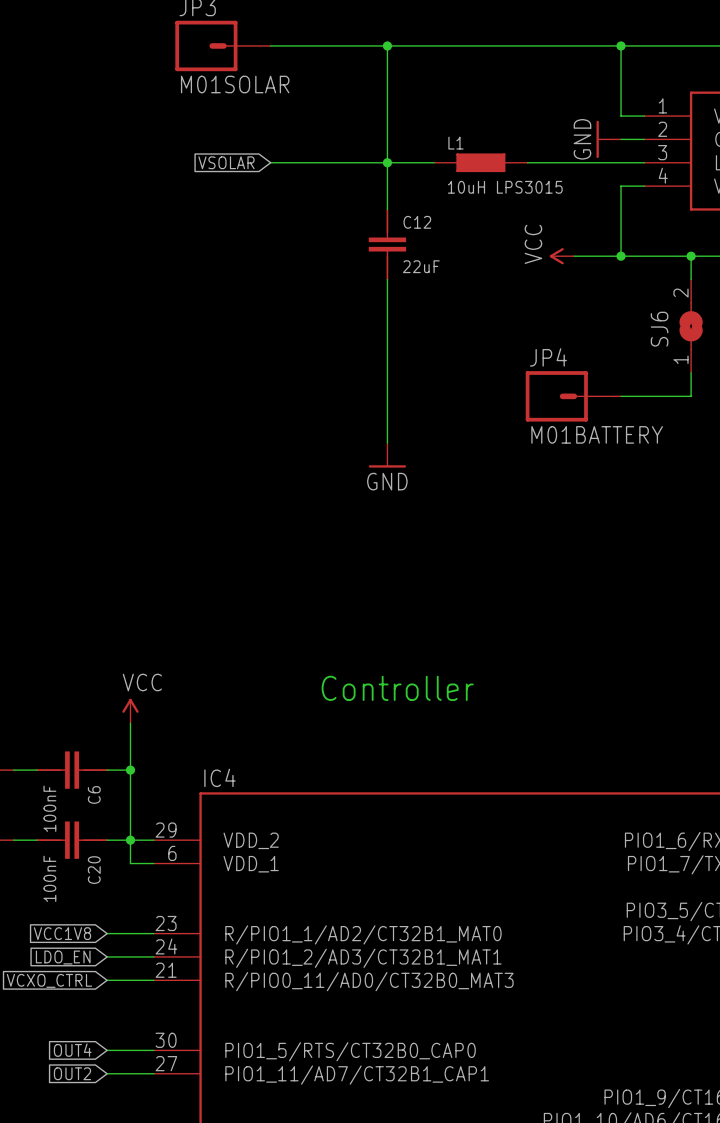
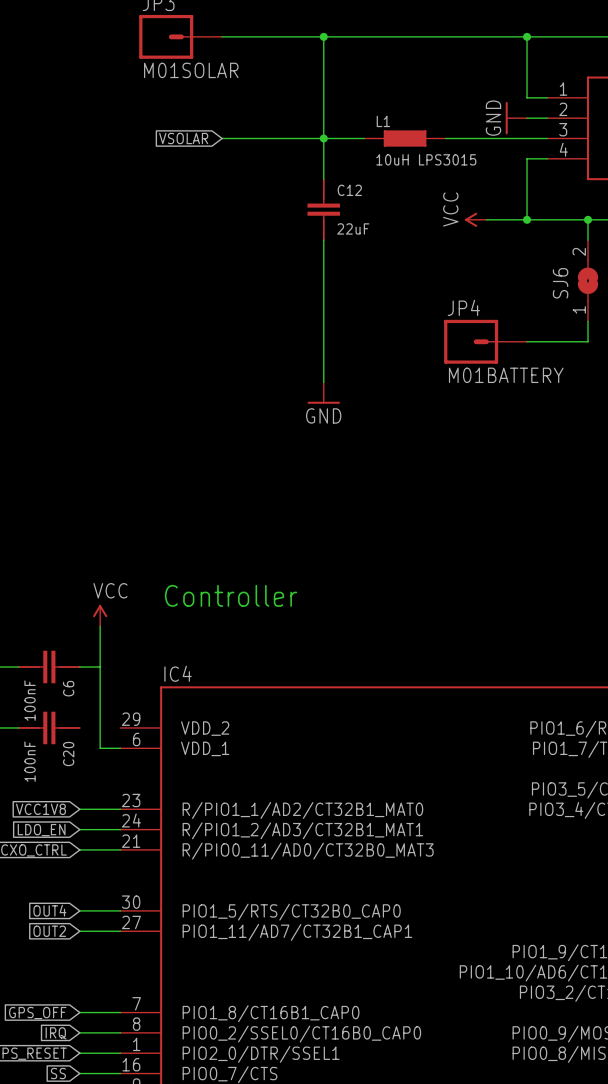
text position: Controller (397, 688) -> Controller (231, 595)
junction: (130, 770) -> none
wire: (107, 840) (153, 840) -> none
junction: (130, 840) -> none

